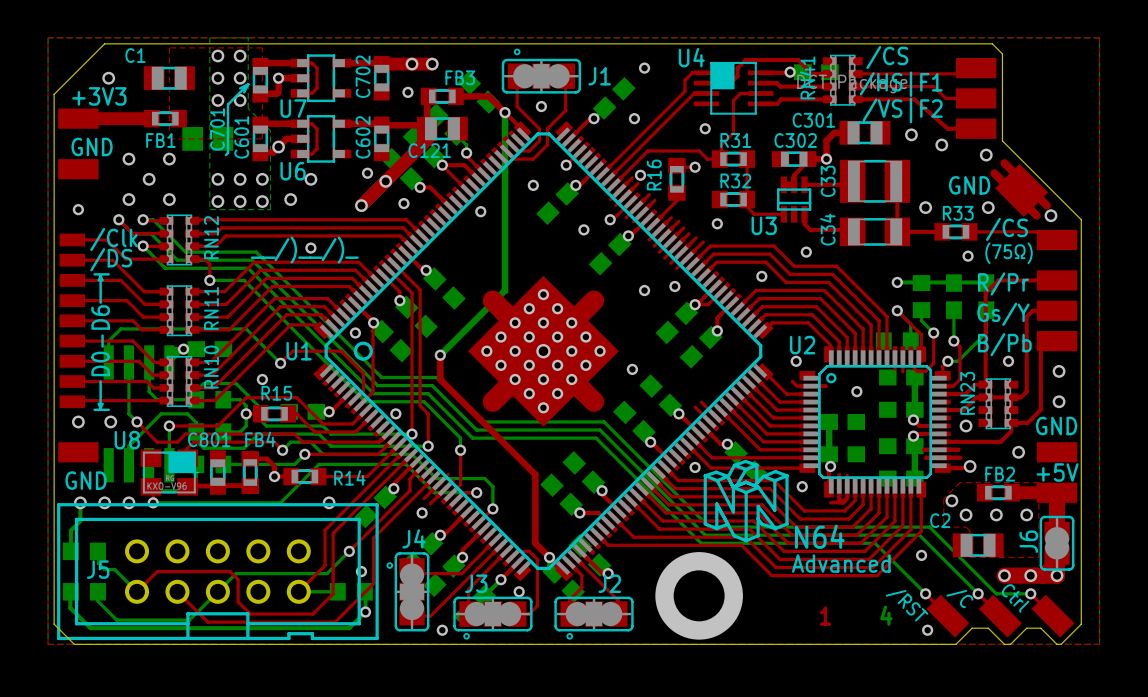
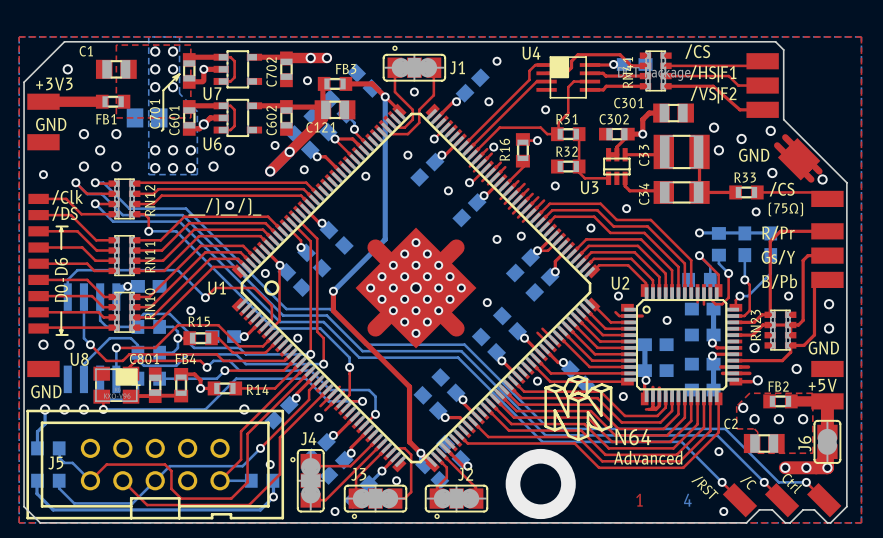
via: (911, 134) -> none
via: (941, 144) -> none
via: none -> (714, 127)
via: none -> (741, 138)
via: none -> (718, 150)
via: (925, 207) -> none

